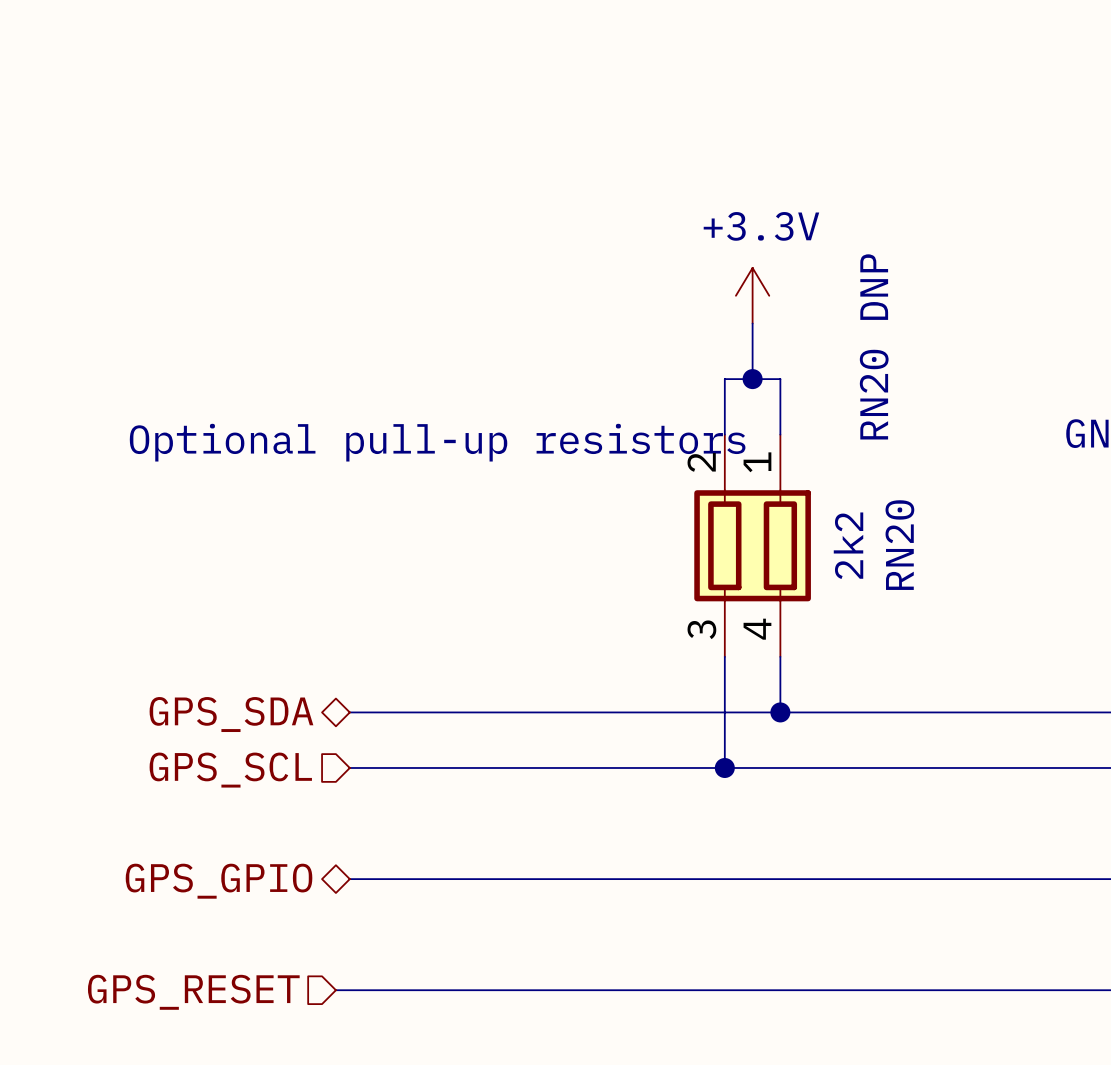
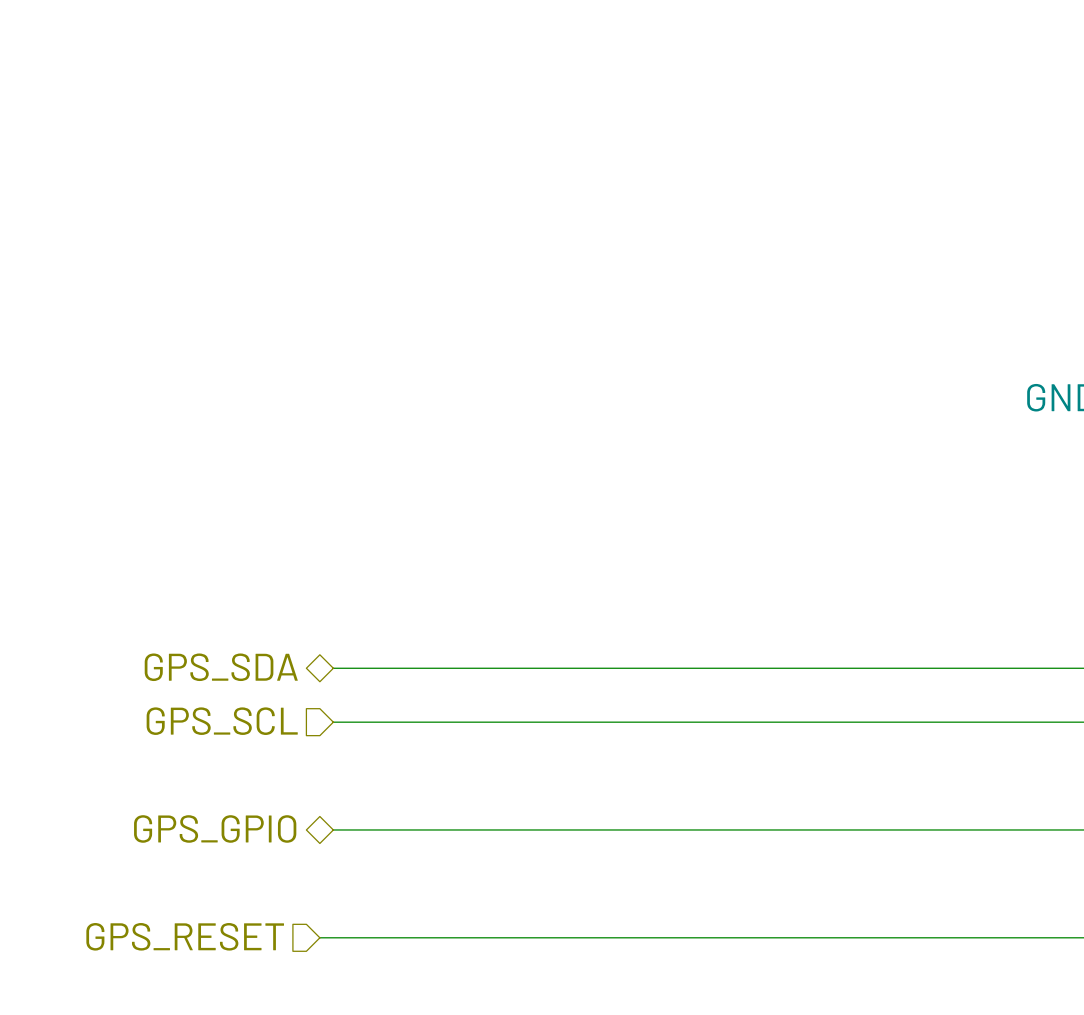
power symbol: +3.3V (752, 295) -> none
wire: (752, 323) (752, 379) -> none
text: RN20 DNP (874, 346) -> none
junction: (752, 379) -> none
wire: (724, 434) (724, 379) (780, 379) (780, 434) -> none
text: Optional pull-up resistors (437, 442) -> none
RN20: 2k2 (752, 545) -> none
wire: (724, 656) (724, 767) -> none
wire: (780, 656) (780, 712) -> none
junction: (780, 712) -> none
junction: (724, 767) -> none

